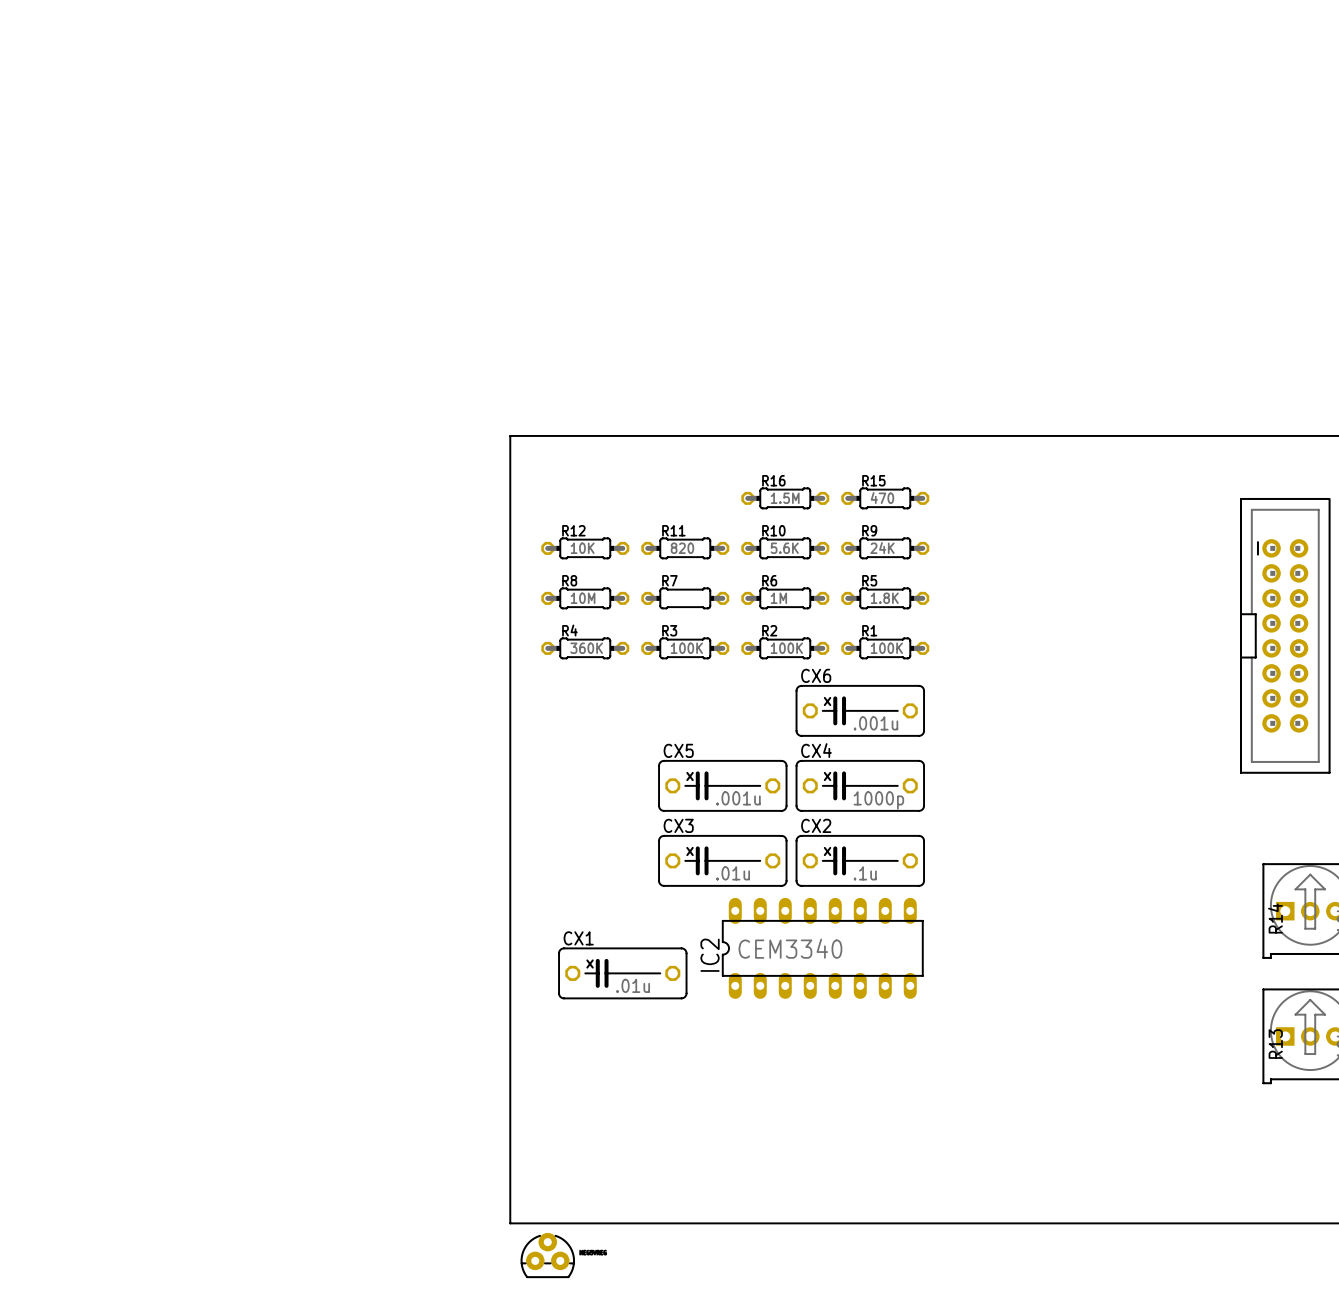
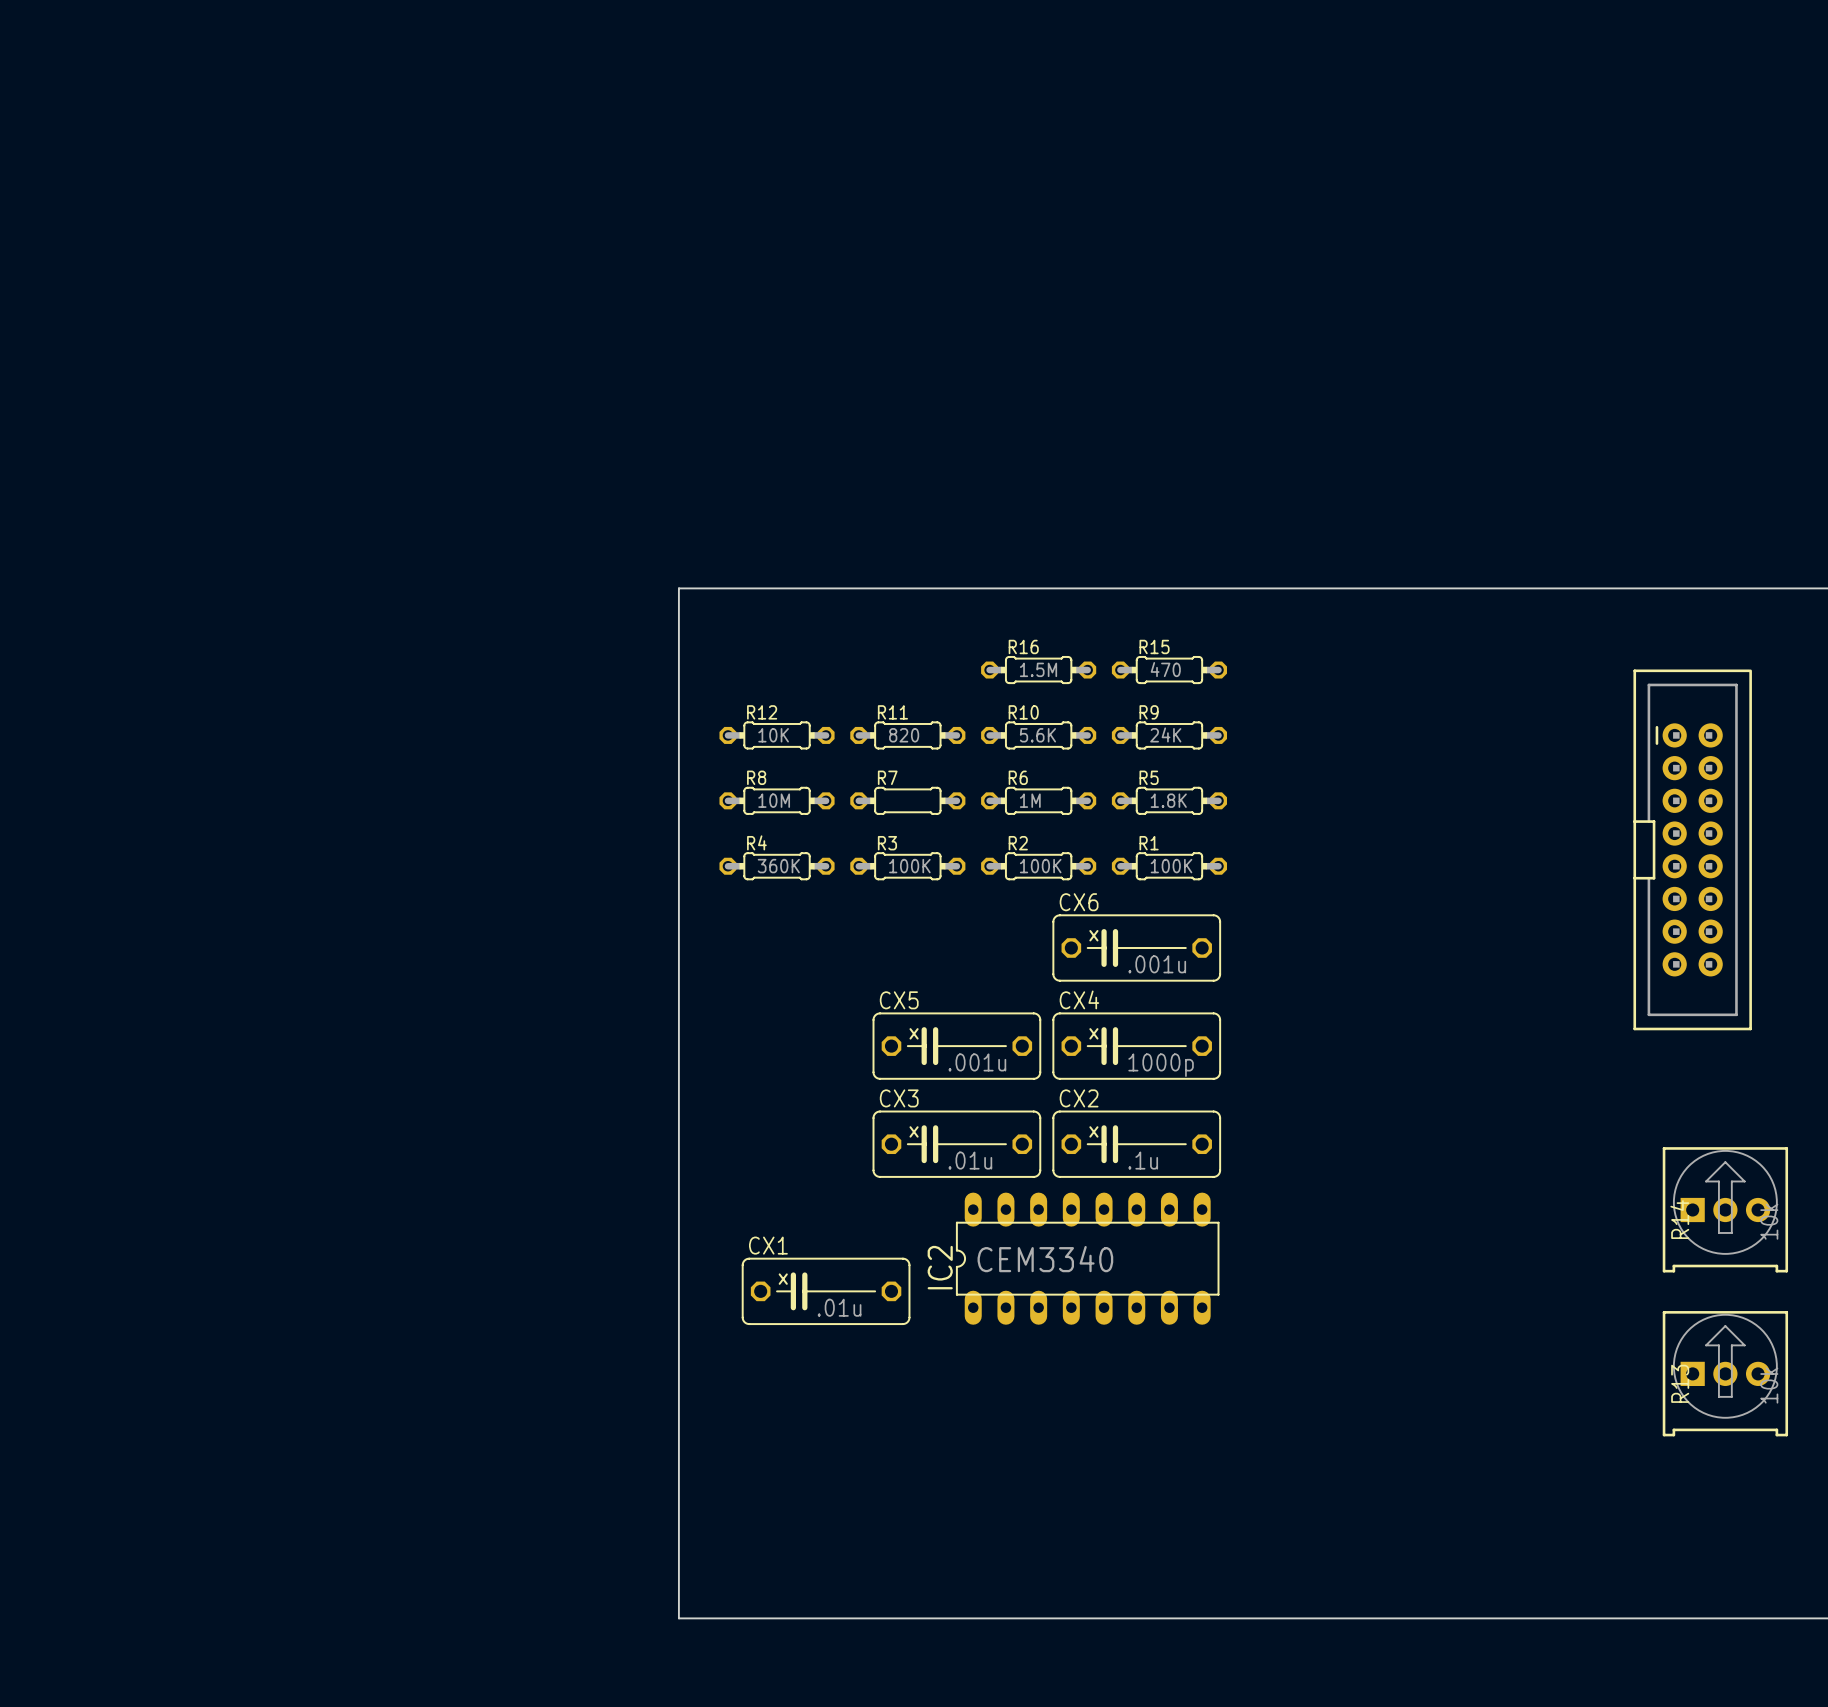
part: (547, 1255) -> none

